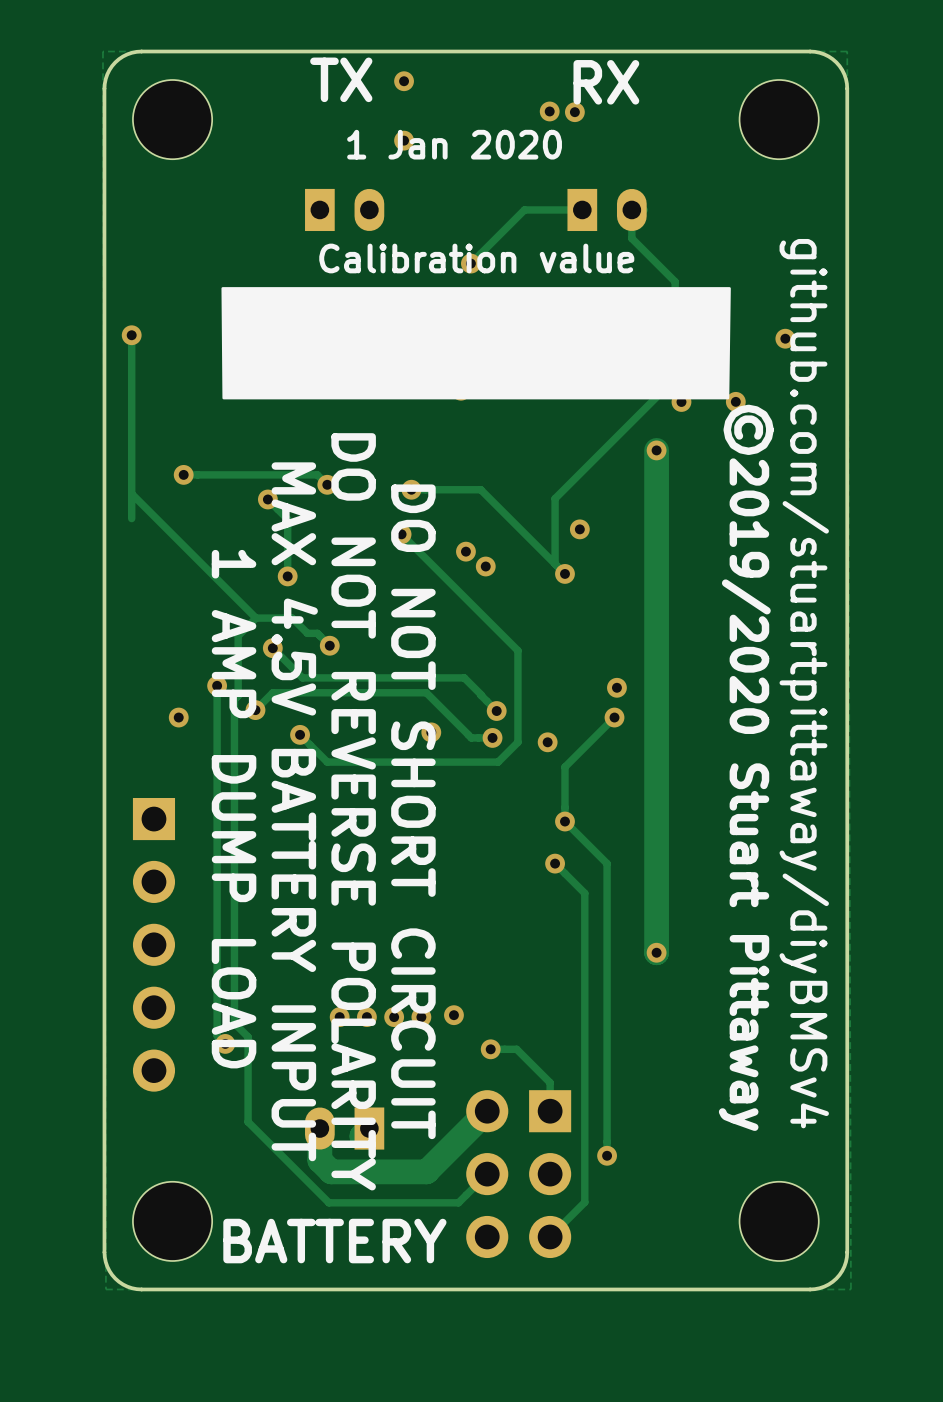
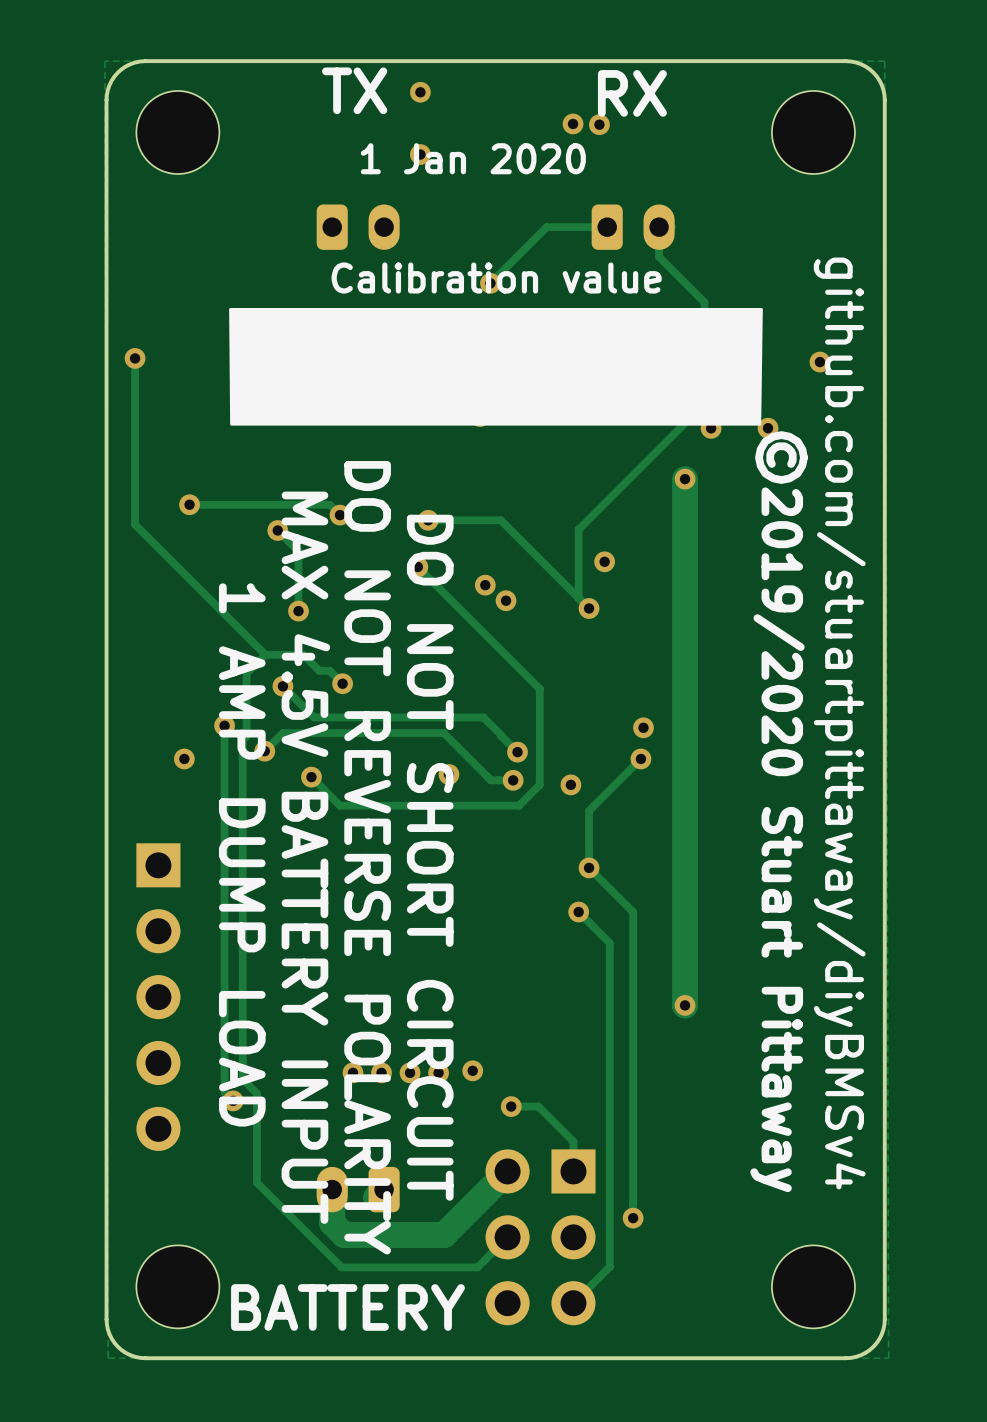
part footprint: [305, 188, 385, 232] -> [316, 204, 400, 250]
part footprint: [567, 188, 647, 232] -> [591, 204, 675, 250]
track: (131, 493) (131, 518) -> none
part footprint: [305, 1107, 385, 1150] -> [316, 1166, 400, 1213]

